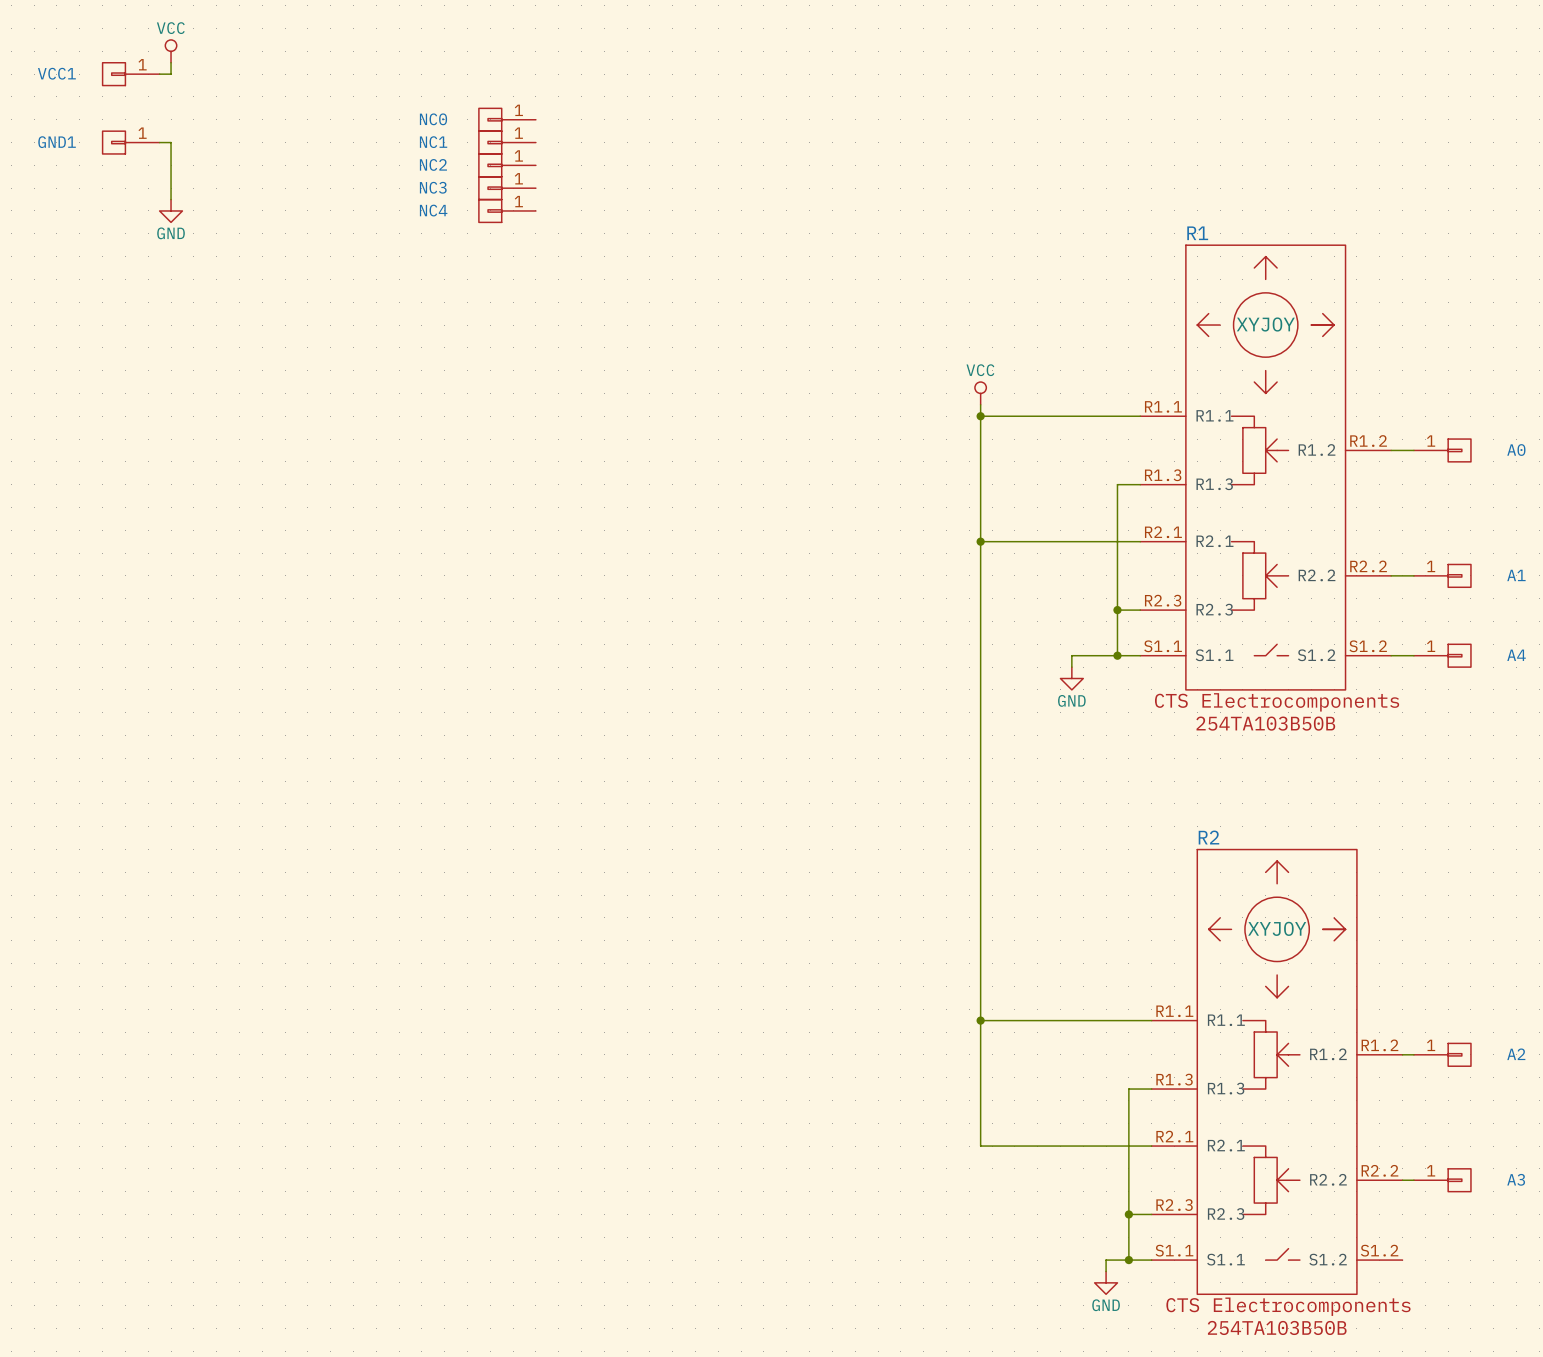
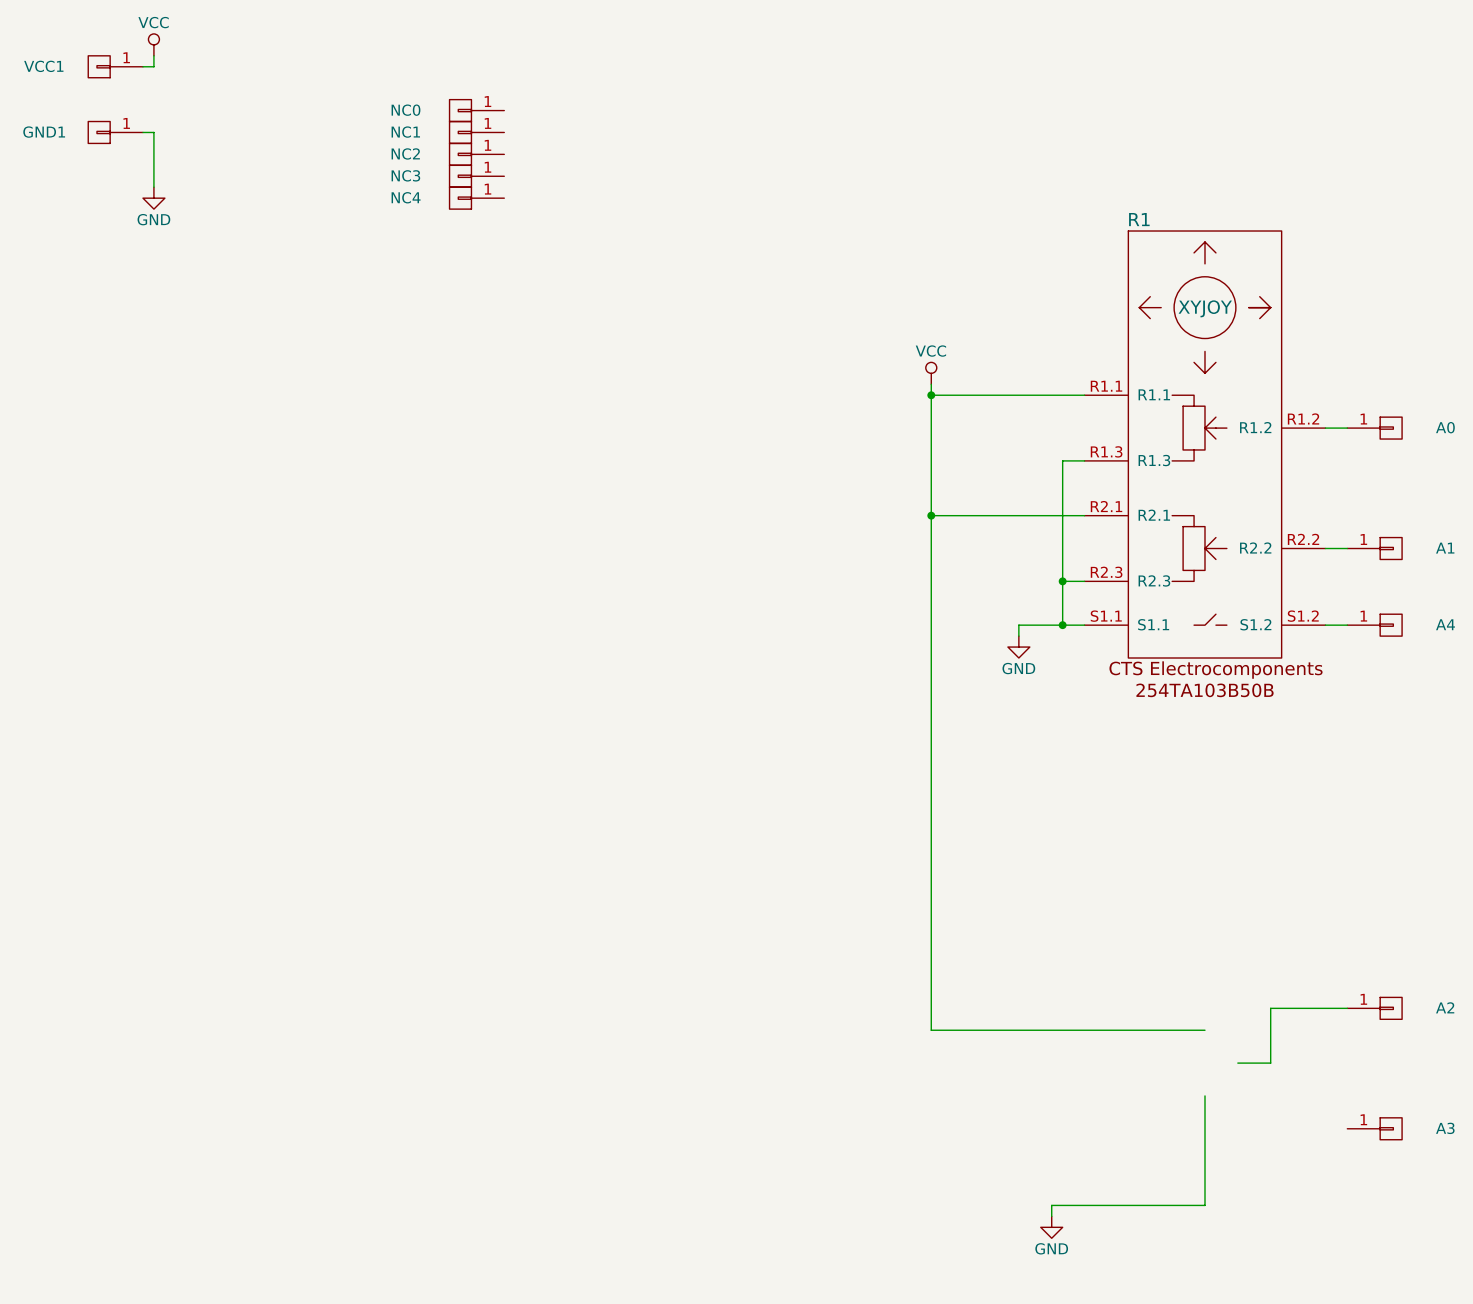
wire: (980, 1020) (1151, 1020) -> none
junction: (980, 1020) -> none
wire: none -> (1336, 1008) (1270, 1008) (1270, 1063) (1237, 1063)
R2: XYJOY (1277, 1071) -> none
wire: (980, 1077) (980, 1146) (1151, 1146) -> (931, 1030) (1204, 1030)
wire: (1151, 1089) (1128, 1089) (1128, 1260) -> none
wire: none -> (1204, 1095) (1204, 1205) (1095, 1205)
wire: (1402, 1180) (1413, 1180) -> none
wire: (1128, 1214) (1151, 1214) -> none
junction: (1128, 1214) -> none
junction: (1128, 1260) -> none

